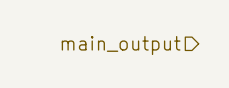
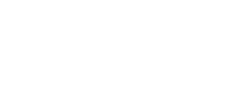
hierarchical label: main_output (121, 45) -> none

